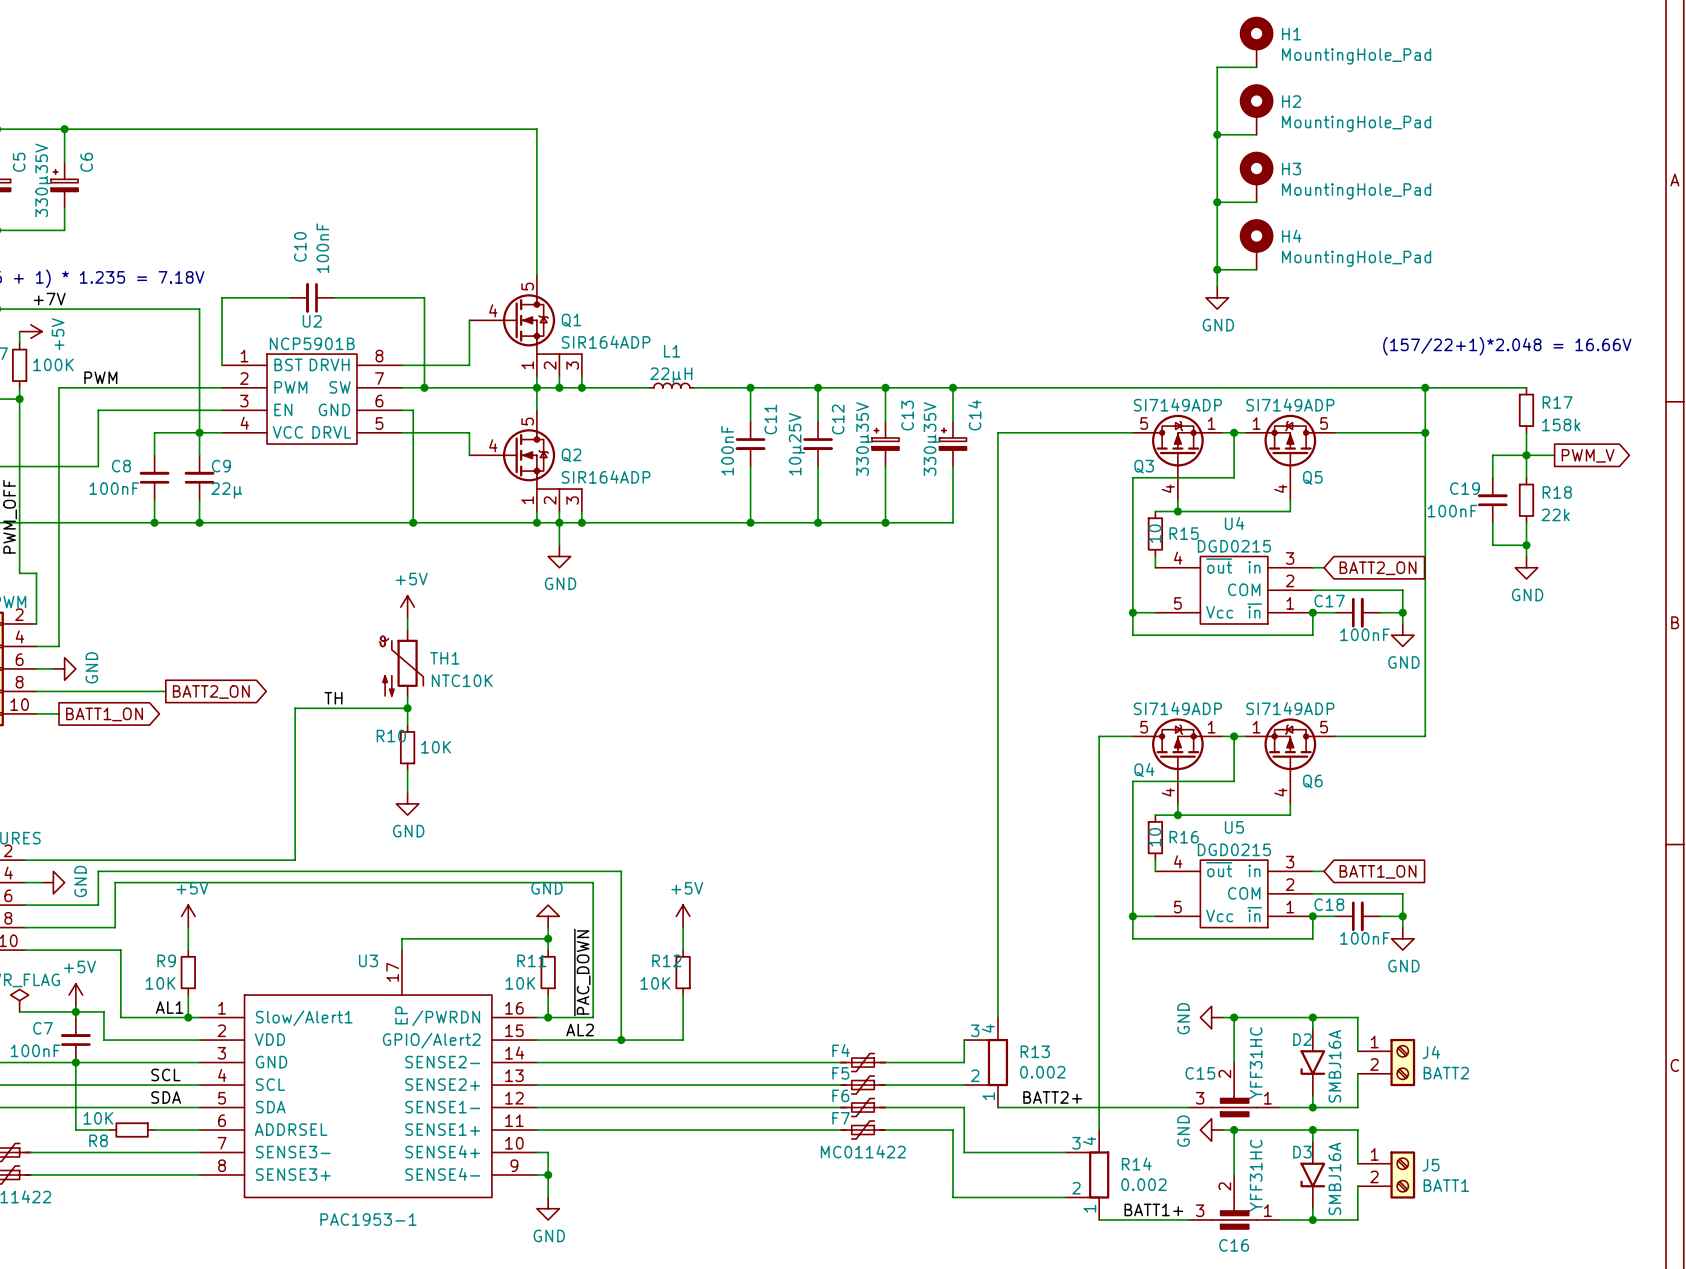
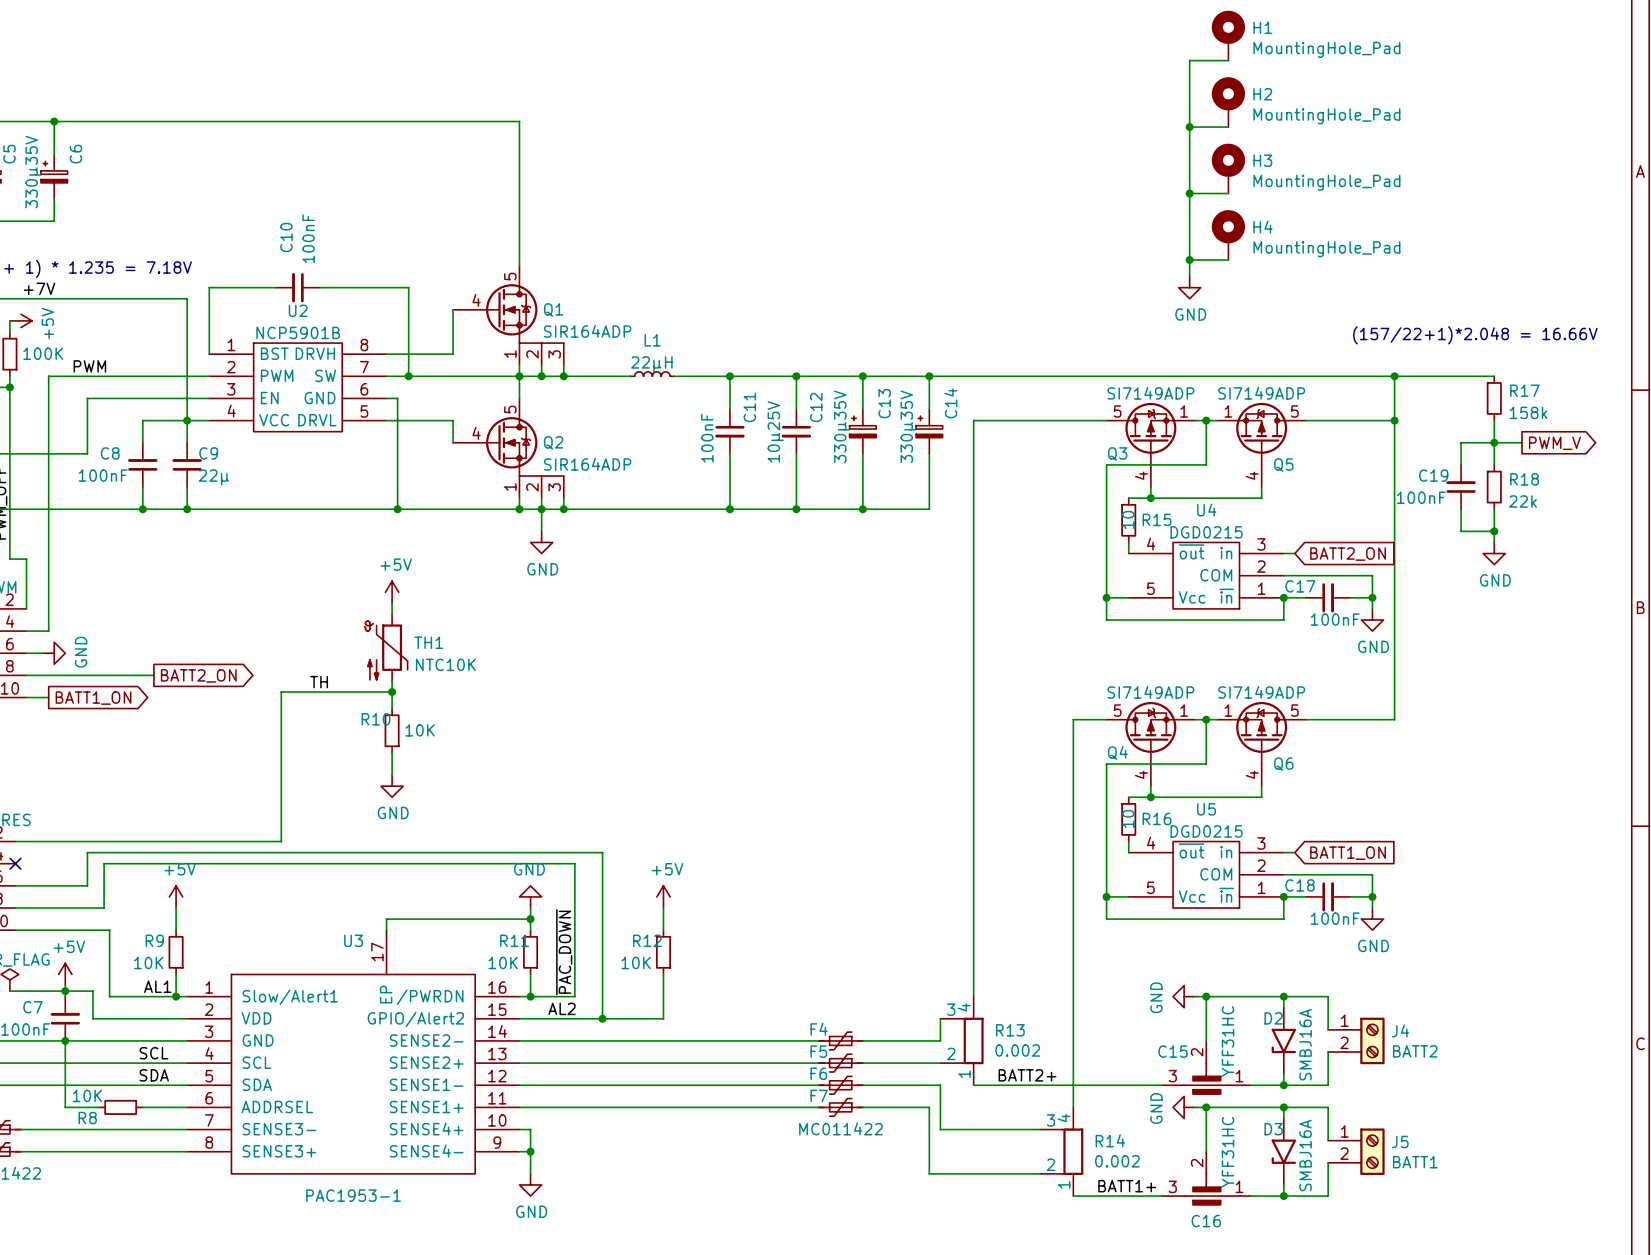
wire: (25, 882) (42, 882) -> none
no-connect mark: none -> (15, 863)
power symbol: GND (53, 882) -> none

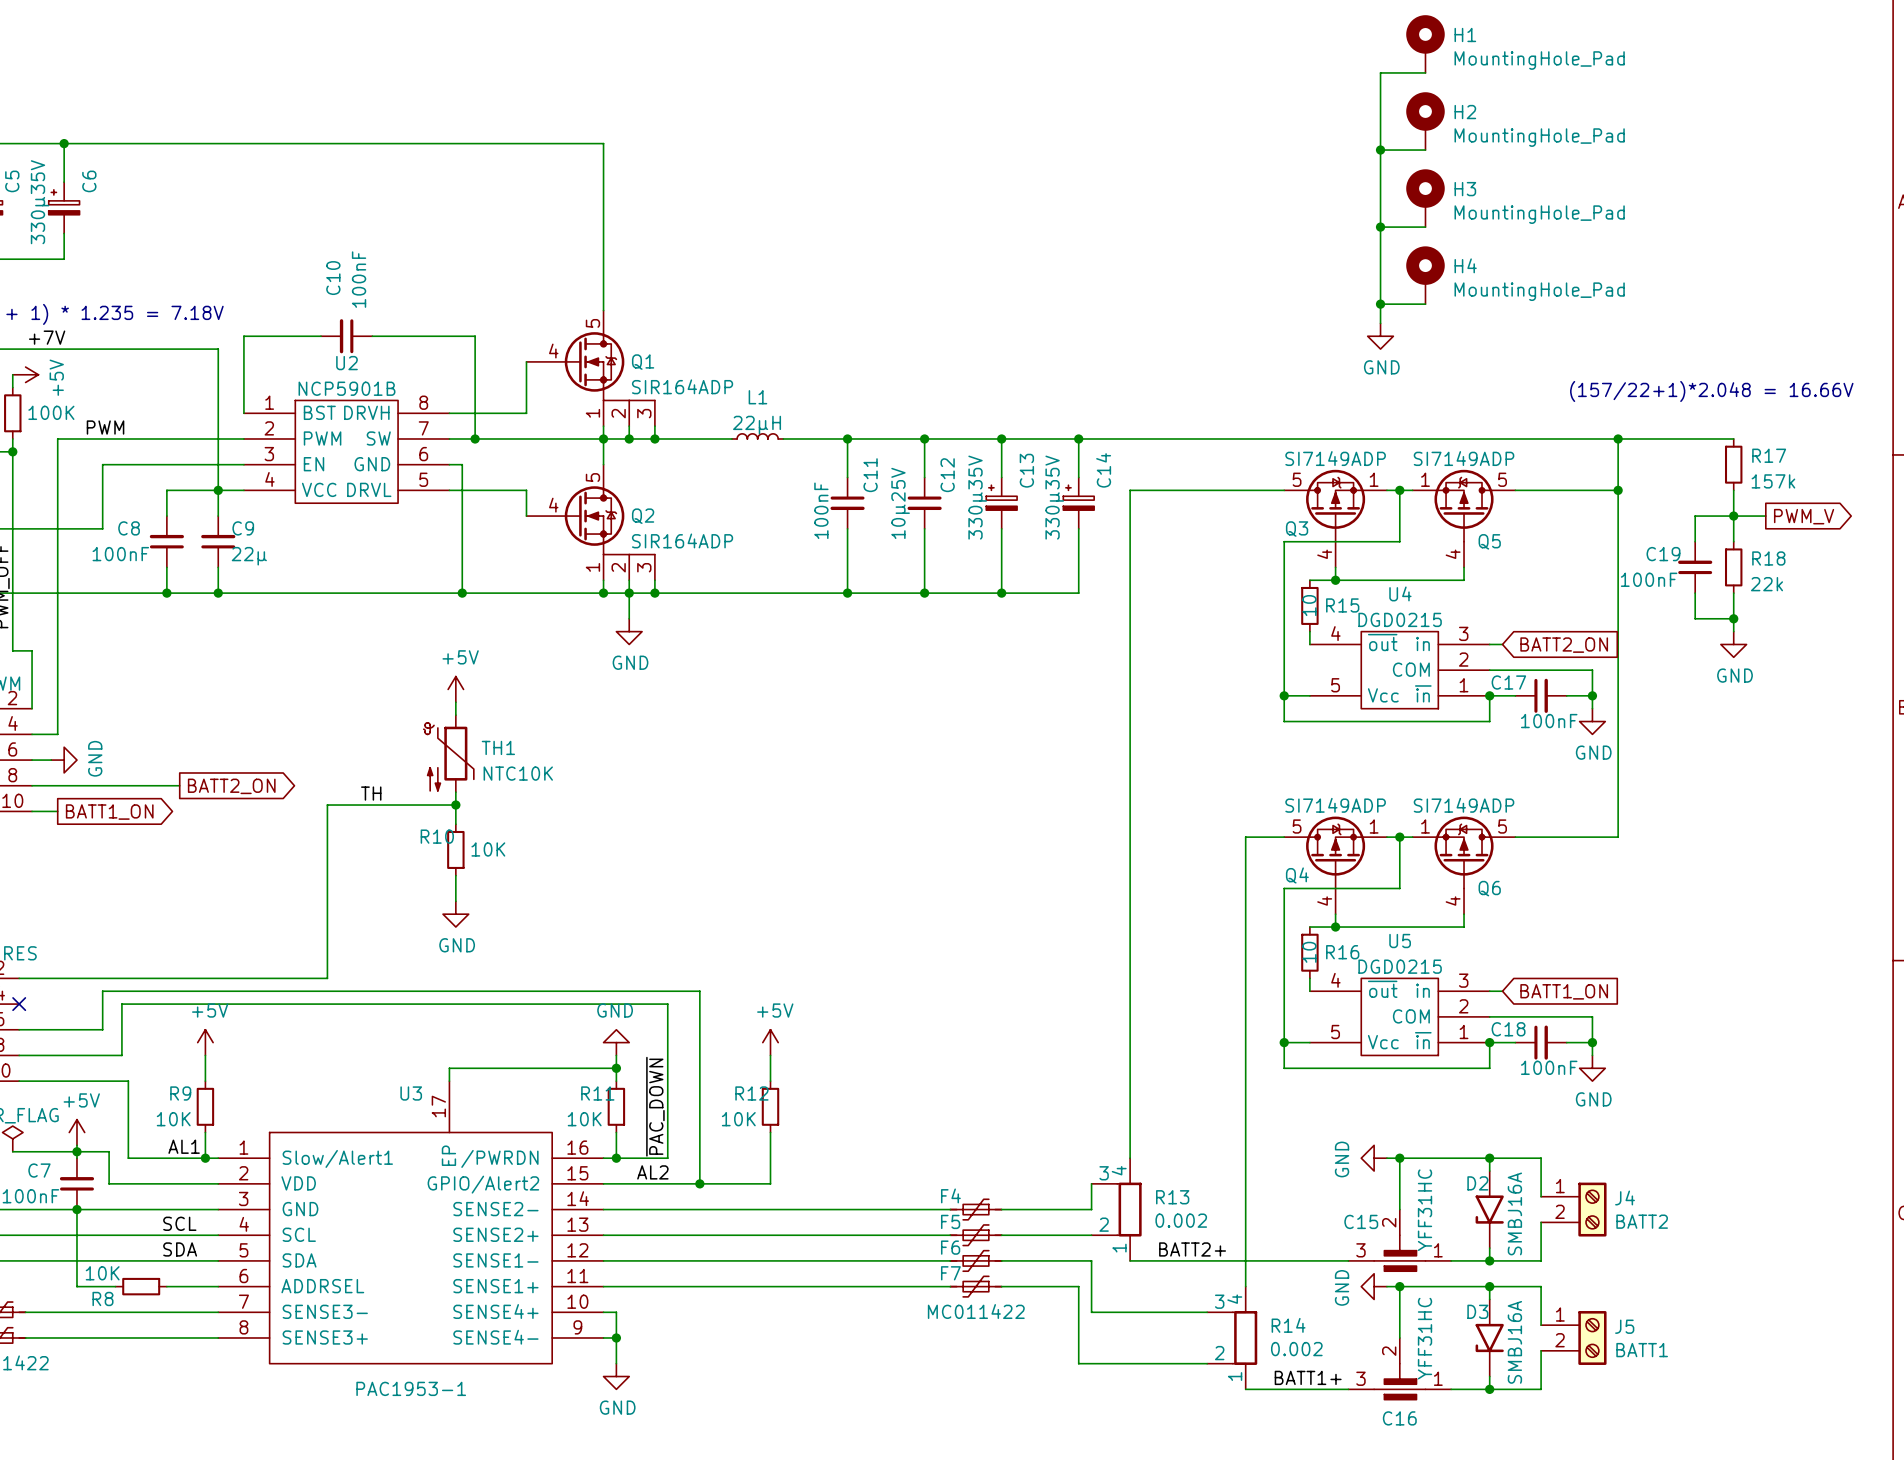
R17 value: 158k (1528, 412) -> 157k (1773, 481)

